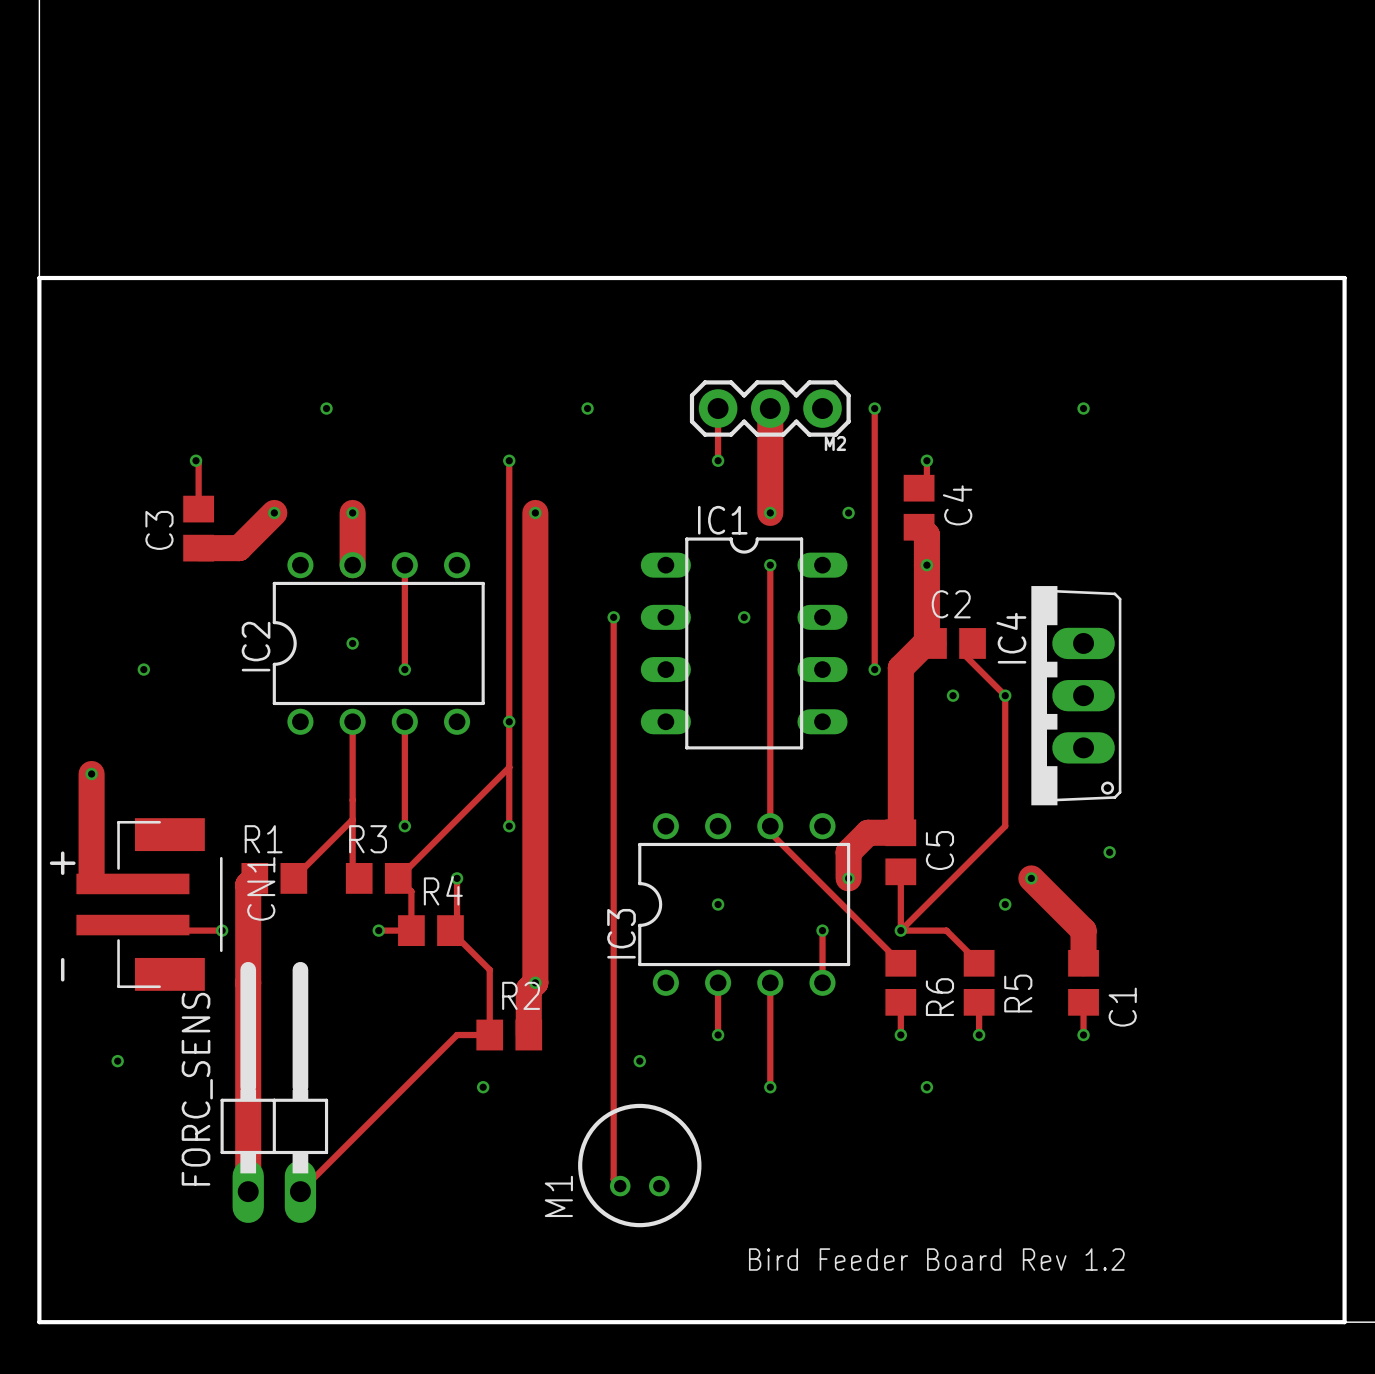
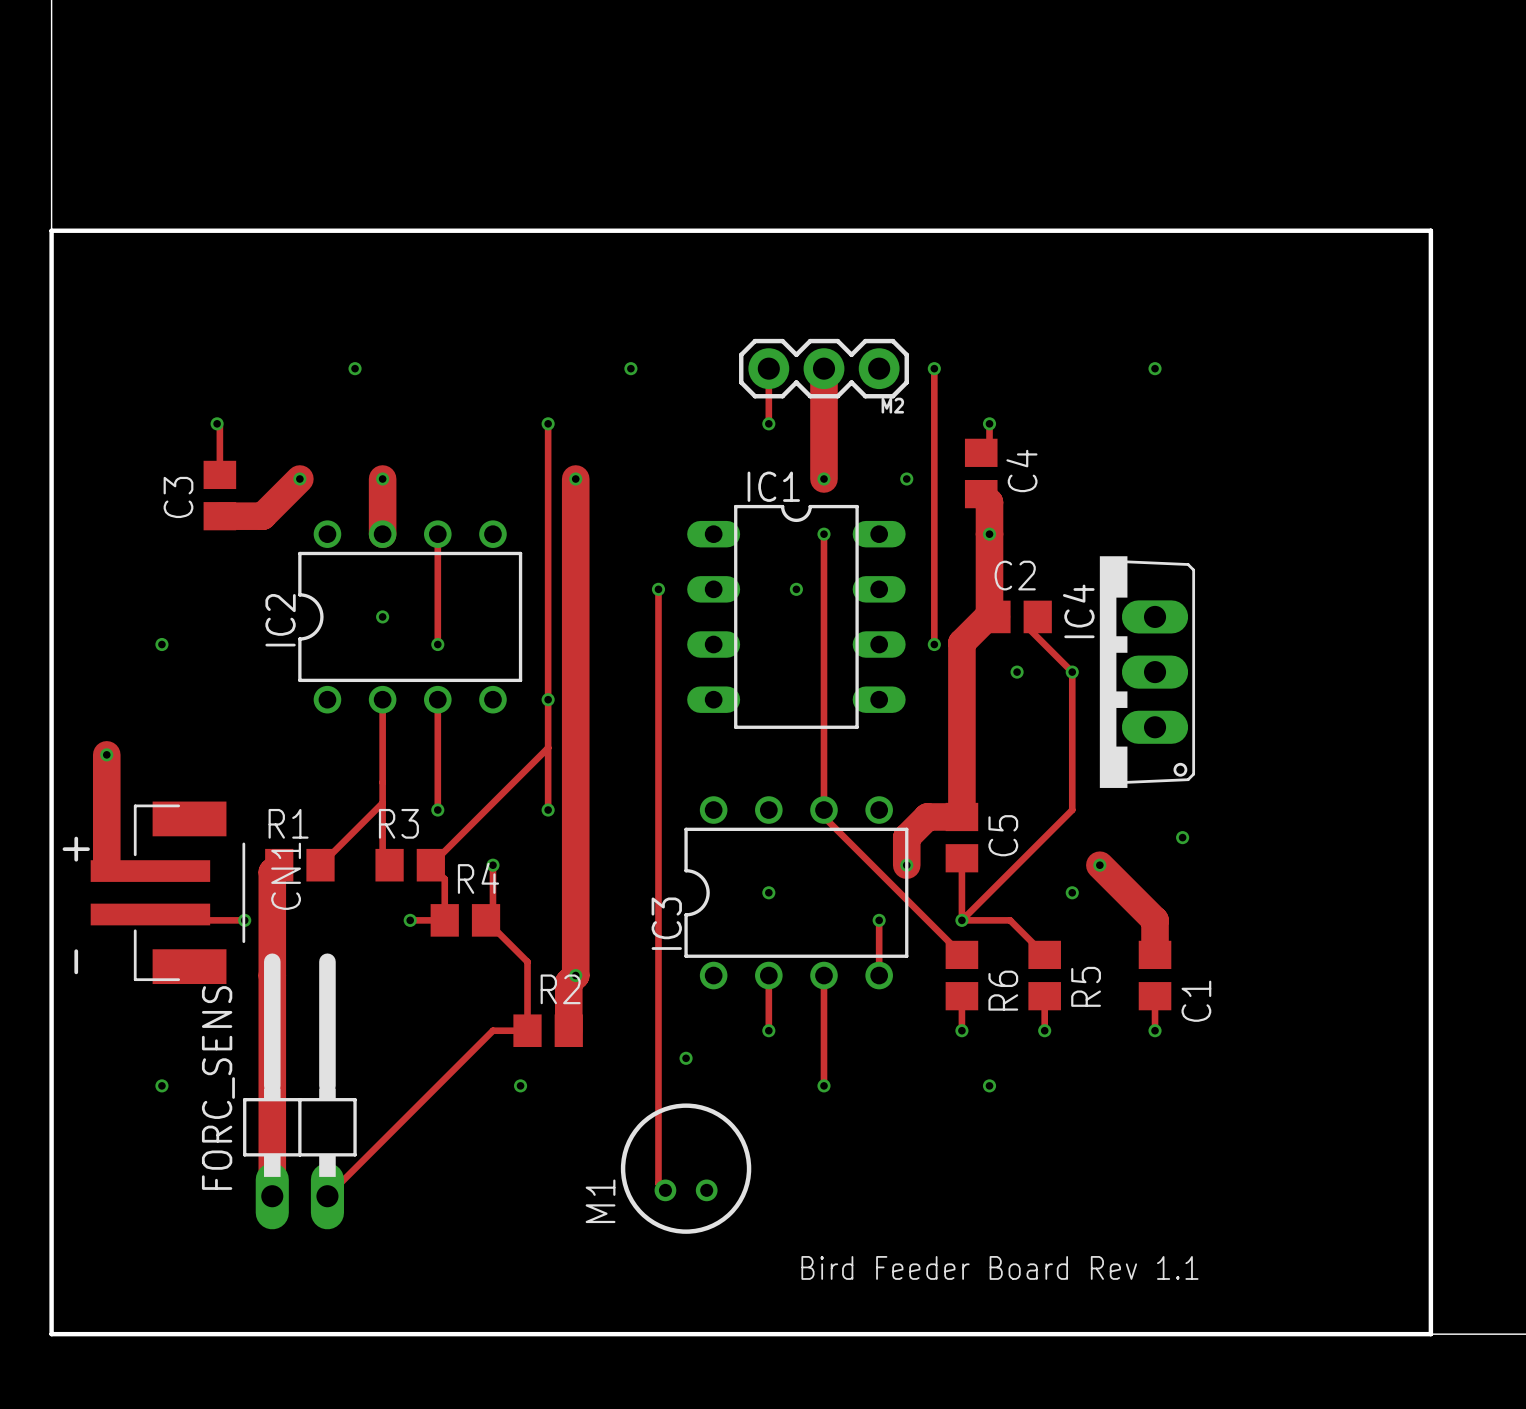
via position: (117, 1061) -> (161, 1085)
text: Bird Feeder Board Rev 1.2 (936, 1259) -> Bird Feeder Board Rev 1.1 (999, 1267)

